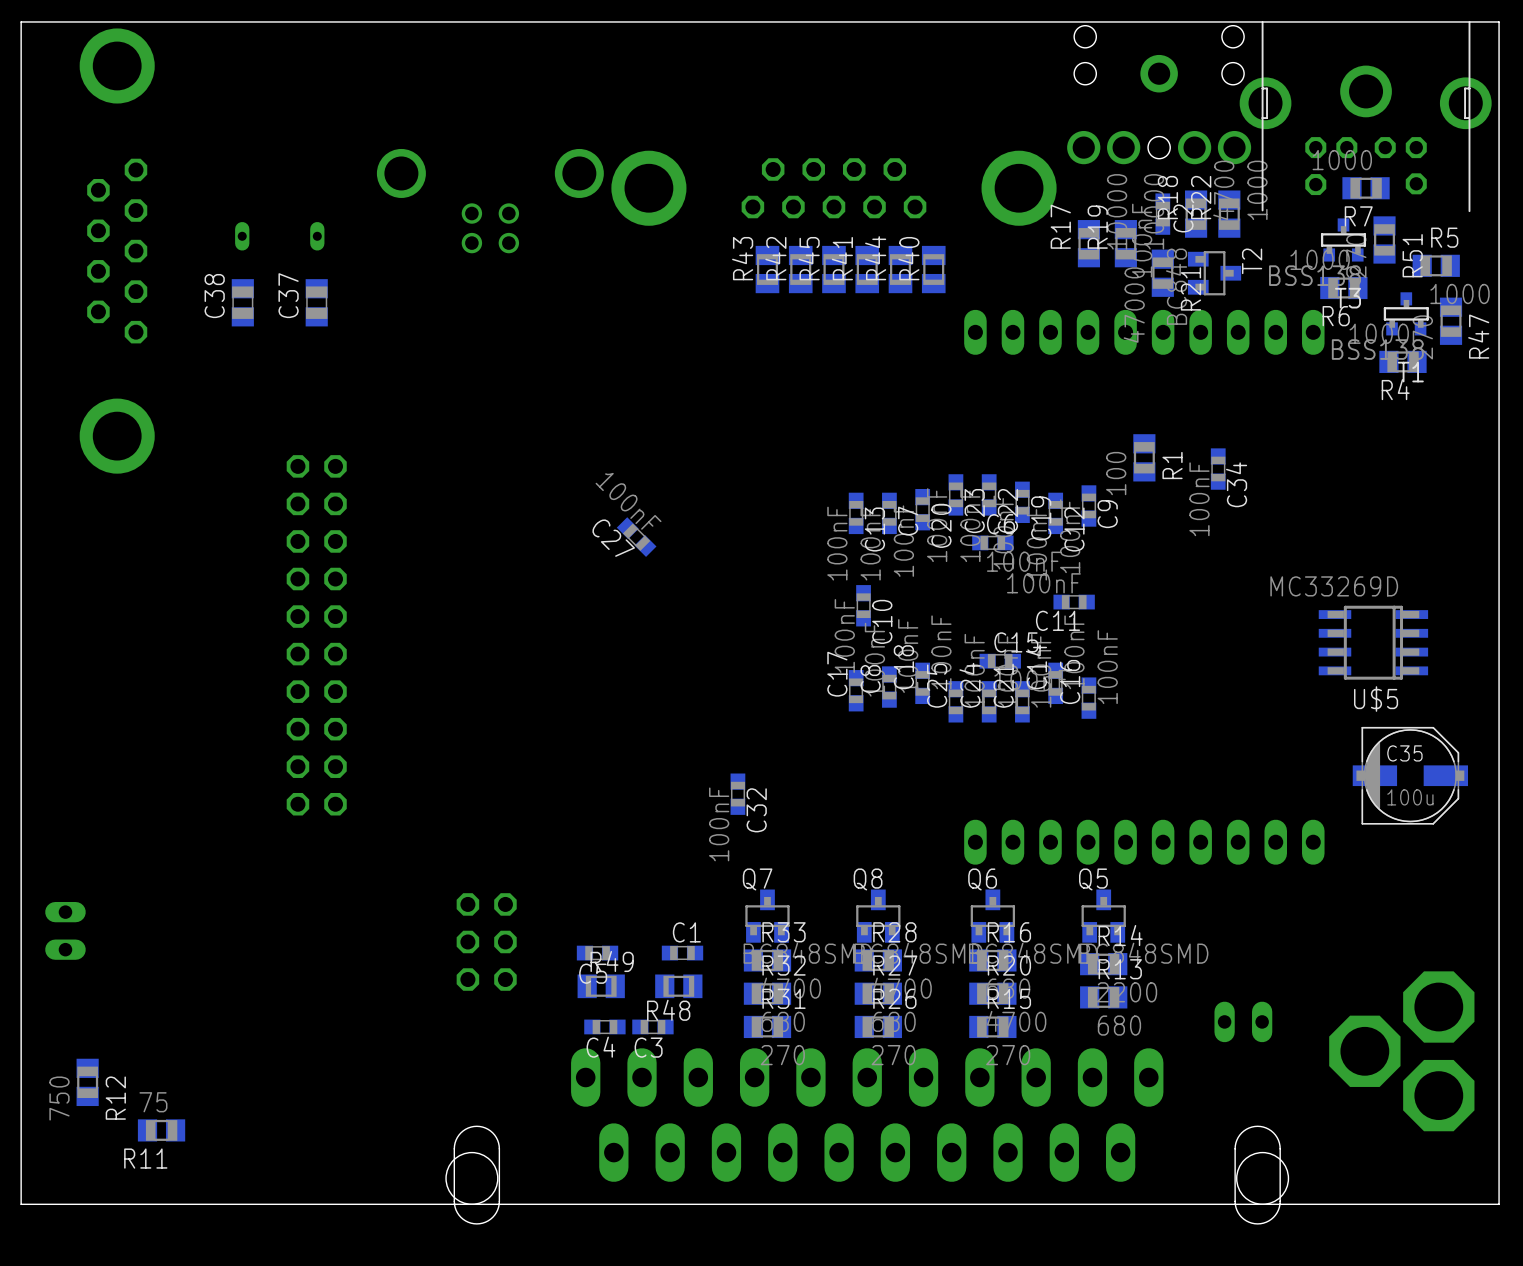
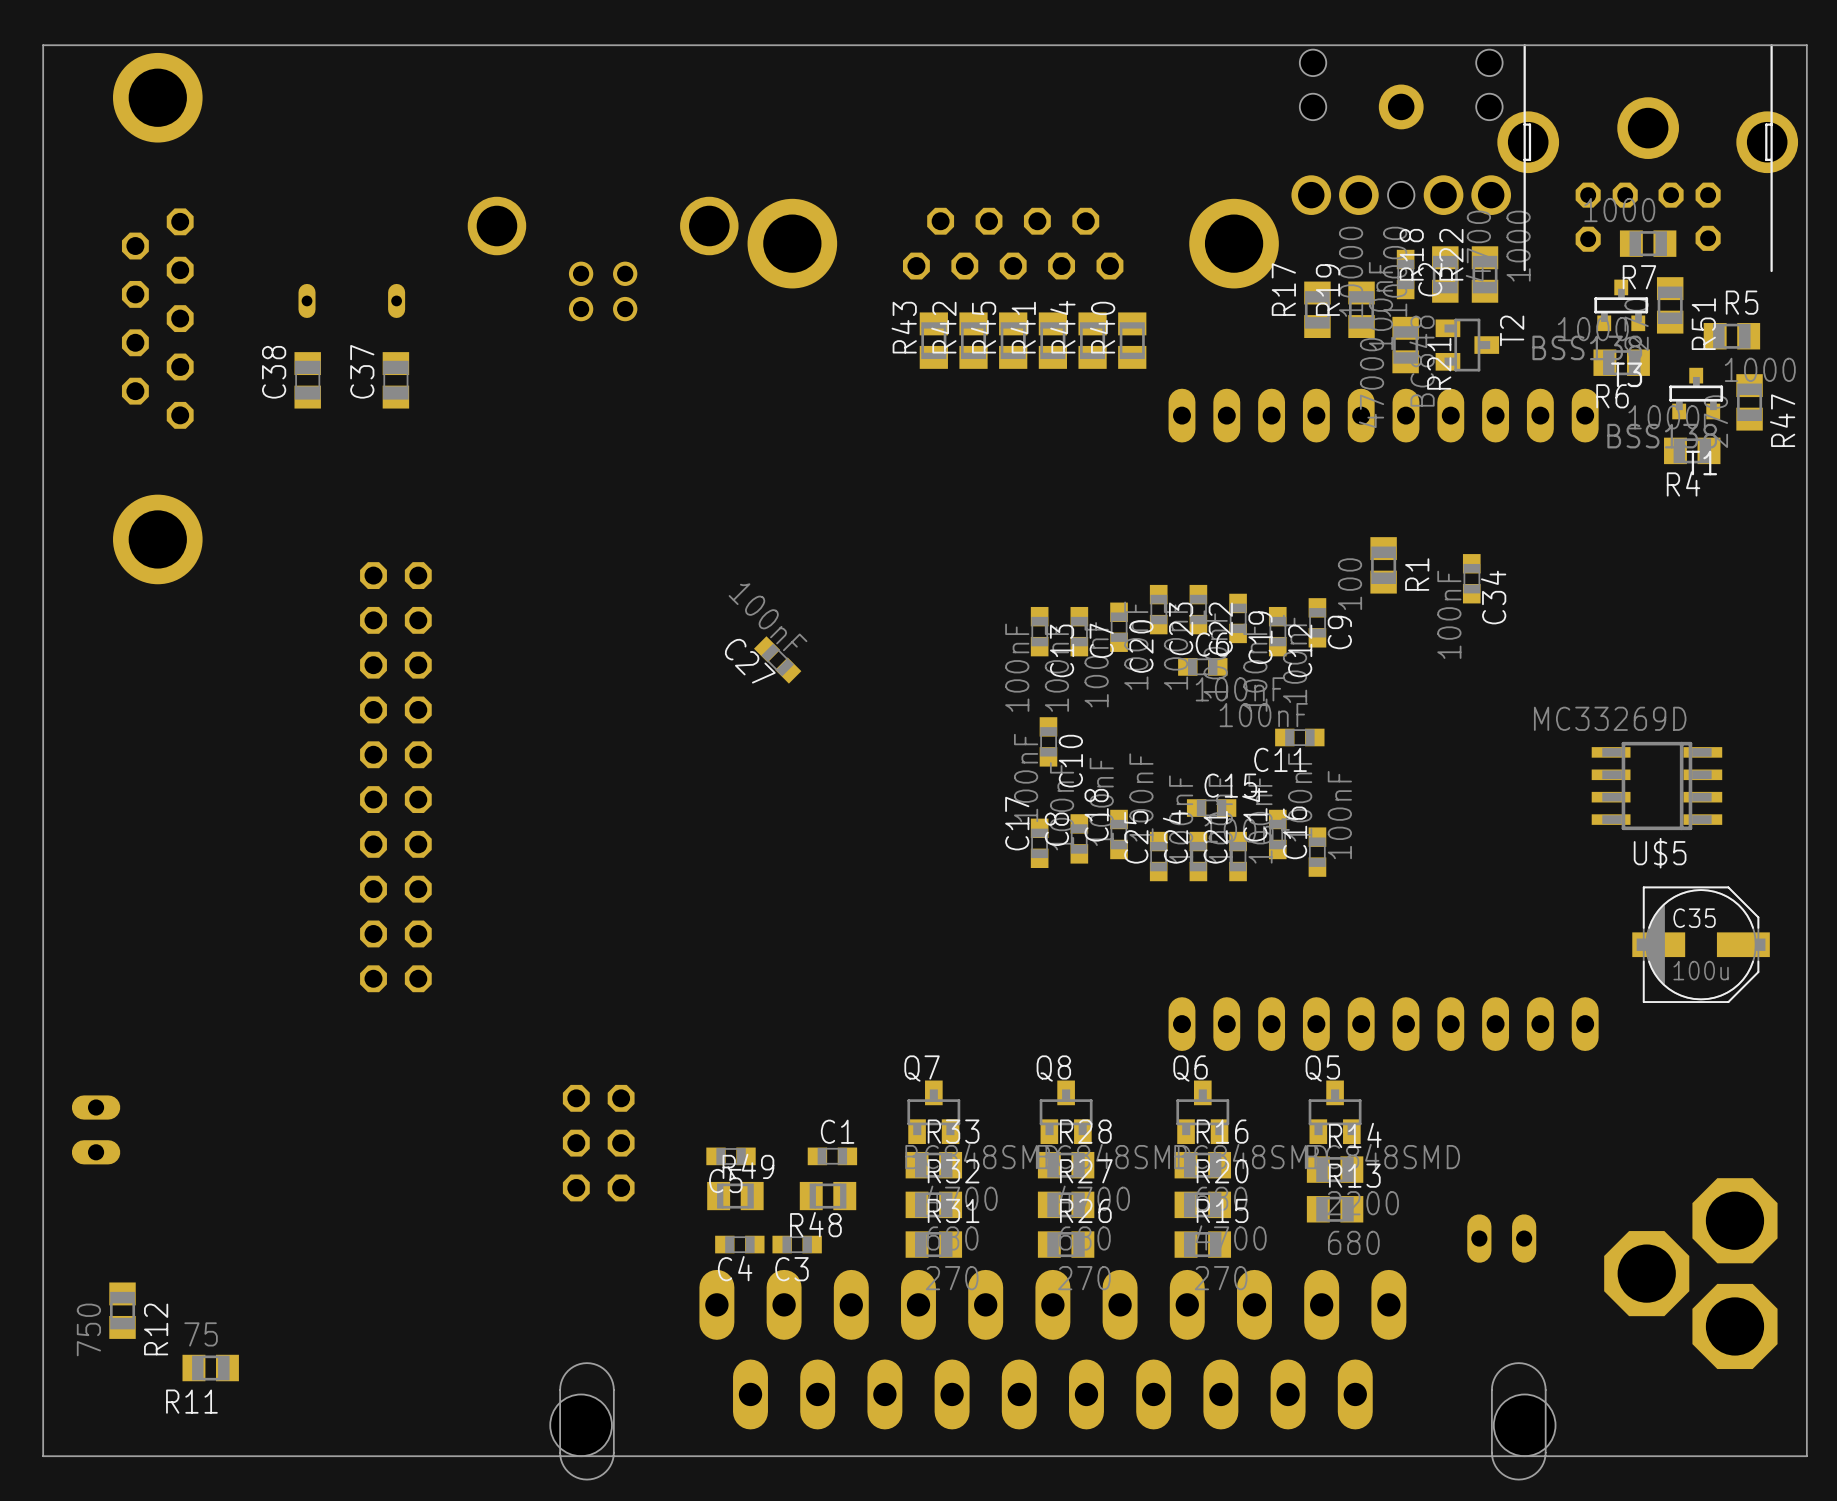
C32: 100nF (737, 794) -> none

